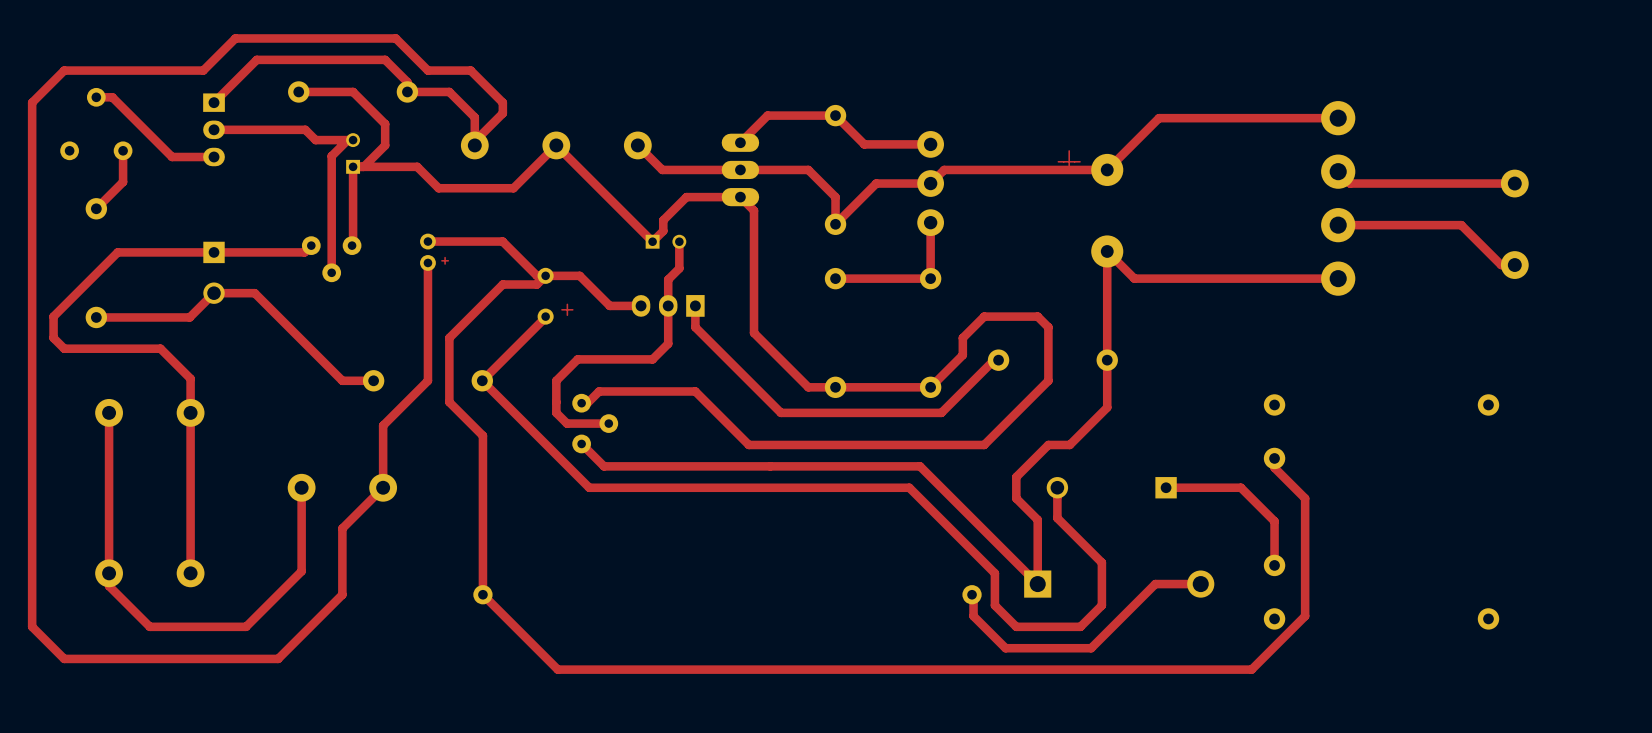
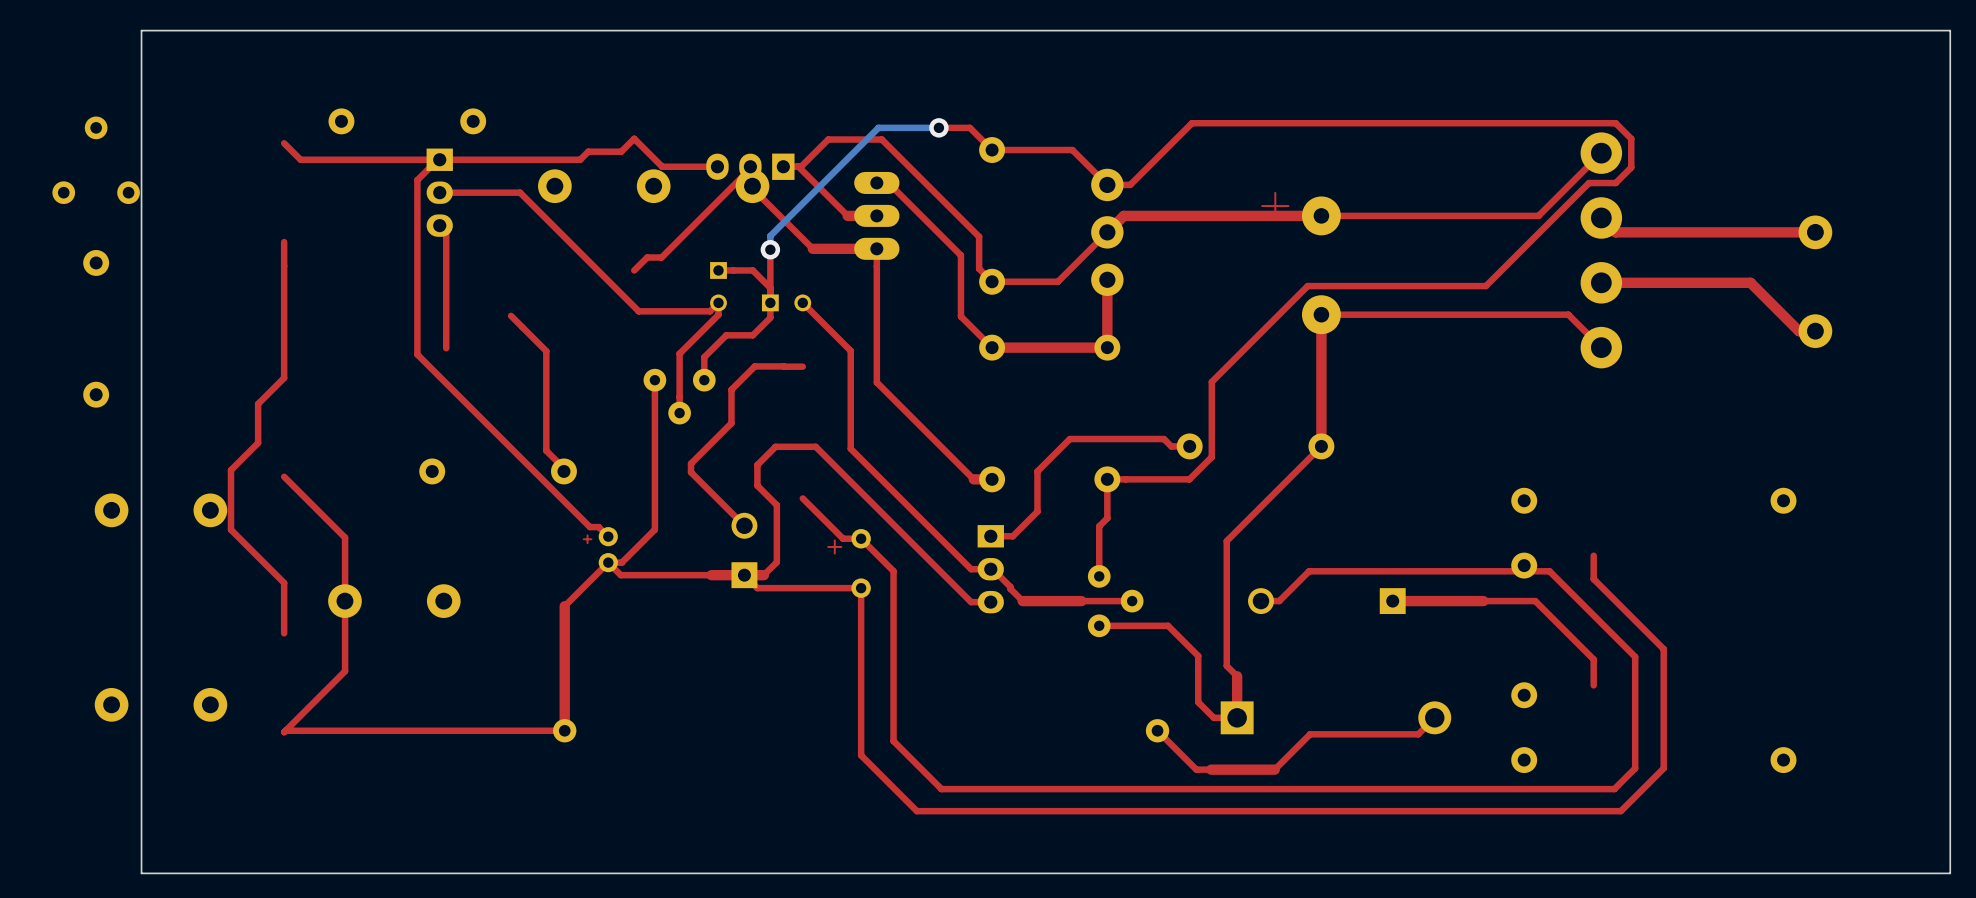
board edge: none -> (1950, 30) (141, 30) (141, 873) (1950, 873) (1950, 30)
top track: (298, 91) (353, 91) (385, 124) (385, 145) (363, 166) -> none
top track: (96, 97) (112, 97) (172, 157) (214, 157) -> none
top track: none -> (938, 127) (969, 127) (992, 150) (1072, 150) (1107, 184) (1130, 184) (1191, 123) (1615, 123) (1631, 138) (1631, 167) (1615, 183) (1588, 183) (1485, 286) (1307, 286) (1211, 381) (1211, 457) (1189, 479) (1107, 479) (1107, 518) (1099, 526) (1099, 576)
bottom track: none -> (938, 127) (878, 127) (770, 235) (770, 249)
via: none -> (938, 127)
top track: (214, 102) (256, 59) (385, 59) (407, 82) (407, 91) (449, 91) (474, 117) (474, 145) -> none
top track: none -> (284, 143) (300, 159) (580, 159) (588, 151) (621, 151) (634, 138) (662, 166) (717, 166)
top track: (1338, 118) (1159, 118) (1107, 169) -> (1601, 153) (1538, 215) (1321, 215)
top track: none -> (437, 159) (417, 180) (417, 354) (589, 527) (598, 527) (608, 536)
top track: (214, 129) (305, 129) (315, 140) (353, 140) -> none
part: (214, 129) -> none
part: none -> (750, 166)
top track: none -> (750, 168) (661, 257) (647, 257) (634, 270)
top track: (347, 140) (331, 156) (331, 272) -> none
top track: (474, 141) (502, 113) (502, 102) (470, 70) (427, 70) (395, 38) (235, 38) (203, 70) (64, 70) (32, 102) (32, 626) (64, 658) (278, 658) (342, 594) (342, 528) (383, 487) (383, 425) (427, 380) (427, 262) -> none
top track: (740, 142) (767, 115) (835, 115) (864, 144) (930, 144) -> (876, 182) (888, 182) (960, 255) (960, 316) (992, 347)
top track: (637, 145) (662, 169) (716, 169) -> (798, 166) (847, 215)
top track: (123, 150) (123, 182) (96, 208) -> none
top track: none -> (439, 192) (520, 192) (638, 311) (710, 311) (718, 302) (718, 314) (679, 353) (679, 413) (675, 408)
part: none -> (439, 192)
part rotation: 0° (353, 153) -> 180° (718, 286)
part position: (353, 153) -> (718, 286)
top track: (740, 169) (808, 169) (835, 197) (835, 224) (876, 183) (930, 183) -> (783, 166) (801, 166) (828, 139) (881, 139) (979, 236) (979, 268) (992, 281) (1057, 281) (1107, 232)
top track: none -> (439, 225) (446, 232) (446, 348)
top track: none -> (284, 242) (284, 377) (258, 403) (258, 443) (230, 470) (230, 529) (284, 582) (284, 633)
top track: none -> (770, 249) (770, 317) (752, 335) (726, 335) (704, 357) (704, 380)
via: none -> (770, 249)
top track: (687, 197) (663, 220) (663, 231) (652, 241) (556, 145) (513, 188) (438, 188) (417, 166) (353, 166) (352, 245) -> (812, 248) (750, 186) (750, 166)
top track: (740, 197) (754, 210) (754, 332) (808, 387) (820, 387) -> (876, 248) (876, 382) (973, 479)
top track: none -> (718, 270) (752, 270) (770, 287)
top track: (427, 241) (502, 241) (536, 275) (579, 275) (609, 305) (641, 305) -> none
top track: (679, 241) (679, 268) (668, 279) (668, 343) (652, 359) (577, 359) (556, 380) (556, 412) (567, 423) (608, 423) -> none
top track: (311, 245) (304, 252) (117, 252) (53, 316) (53, 338) (64, 348) (160, 348) (190, 378) (190, 573) -> none
top track: (1107, 251) (1134, 278) (1338, 278) -> (1321, 314) (1568, 314) (1601, 347)
part rotation: 0° (434, 252) -> 180° (600, 549)
part position: (434, 252) -> (600, 549)
top track: none -> (511, 315) (546, 351) (546, 450) (559, 463)
part: (331, 259) -> none
part: (214, 272) -> none
top track: (545, 275) (536, 284) (502, 284) (449, 338) (449, 402) (482, 435) (482, 491) -> (608, 562) (564, 606)
top track: none -> (802, 366) (754, 366) (731, 389) (731, 423) (691, 463) (691, 472) (744, 525)
part rotation: 0° (555, 296) -> 180° (849, 563)
part position: (555, 296) -> (849, 563)
top track: none -> (654, 380) (654, 529) (621, 562) (608, 562)
part: (668, 305) -> none
top track: (695, 305) (695, 327) (780, 412) (941, 412) (994, 360) -> (990, 536) (1012, 536) (1037, 511) (1037, 471) (1069, 439) (1163, 439) (1171, 446) (1184, 446)
top track: (545, 316) (482, 380) (589, 487) (860, 487) -> (802, 302) (850, 350) (850, 448) (971, 569) (992, 569) (1022, 601)
top track: (96, 317) (189, 317) (214, 293) (254, 293) (342, 380) (373, 380) -> none
top track: (1107, 360) (1107, 407) (1069, 444) (1048, 444) (1016, 477) (1016, 498) (1037, 519) (1037, 549) -> (1321, 446) (1226, 541) (1226, 665) (1237, 676)
top track: none -> (284, 476) (345, 537) (345, 671) (284, 732)
top track: (835, 387) (930, 387) (962, 355) (962, 338) (984, 316) (1037, 316) (1048, 327) (1048, 380) (984, 444) (748, 444) (695, 391) (599, 391) (587, 403) (581, 403) -> none
top track: none -> (802, 498) (843, 538) (861, 538) (893, 571) (893, 741) (941, 789) (1614, 789) (1635, 768) (1635, 656) (1549, 571) (1309, 571) (1279, 601) (1260, 601)
top track: (109, 412) (109, 586) (149, 626) (246, 626) (301, 571) (301, 487) -> none
part rotation: 0° (595, 423) -> 90° clockwise (679, 396)
part position: (595, 423) -> (679, 396)
top track: (581, 443) (604, 466) -> (608, 562) (620, 575) (711, 575)
part: none -> (744, 550)
top track: none -> (1593, 555) (1593, 579) (1663, 649) (1663, 768) (1620, 811) (916, 811) (861, 755) (861, 588) (757, 588) (744, 575)
top track: (1274, 458) (1274, 467) (1305, 498) (1305, 616) (1251, 669) (557, 669) (482, 594) -> (285, 730) (564, 730)
part: none -> (990, 569)
top track: (647, 466) (920, 466) (1037, 584) -> (763, 575) (776, 562) (776, 505) (757, 485) (757, 464) (775, 446) (815, 446) (971, 602) (990, 602)
top track: (909, 487) (994, 573) (994, 605) (1016, 626) -> (1159, 732) (1196, 769) (1211, 769)
part: none -> (1115, 601)
top track: none -> (1132, 601) (1081, 601)
top track: (1057, 487) (1057, 518) (1101, 562) (1101, 605) (1080, 626) (1068, 626) -> (1434, 717) (1418, 734) (1310, 734) (1274, 769)
top track: (1240, 487) (1274, 521) (1274, 565) -> (1483, 601) (1535, 601) (1593, 659) (1593, 685)
top track: none -> (1099, 625) (1168, 625) (1198, 655) (1198, 702) (1213, 717) (1237, 717)
top track: (1200, 592) (1200, 584) (1155, 584) (1091, 648) (1005, 648) (973, 616) (973, 596) -> none

